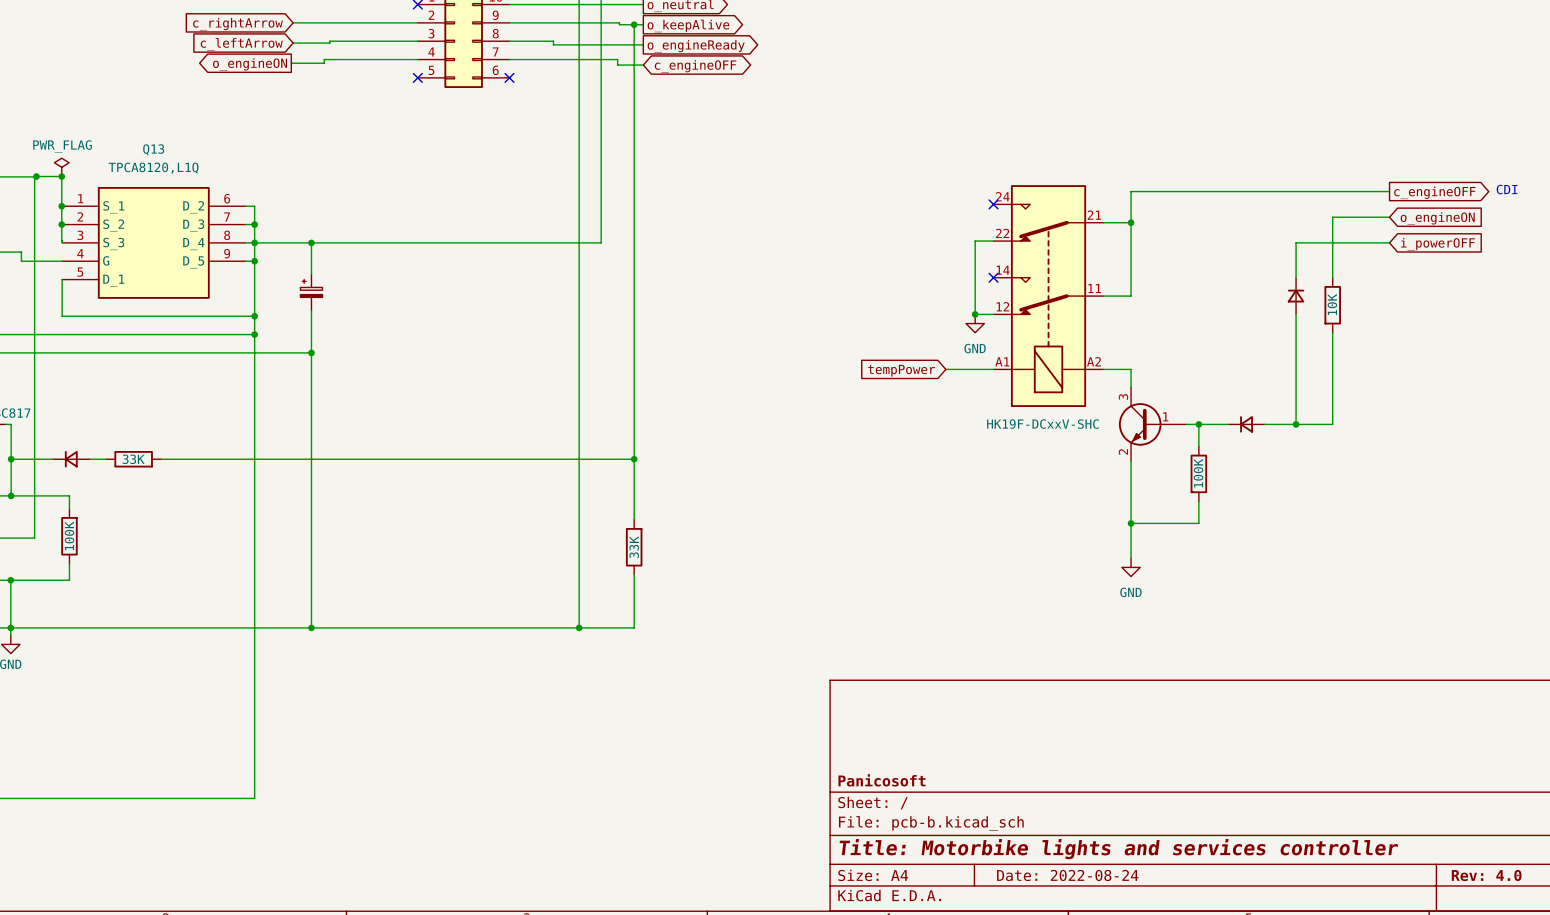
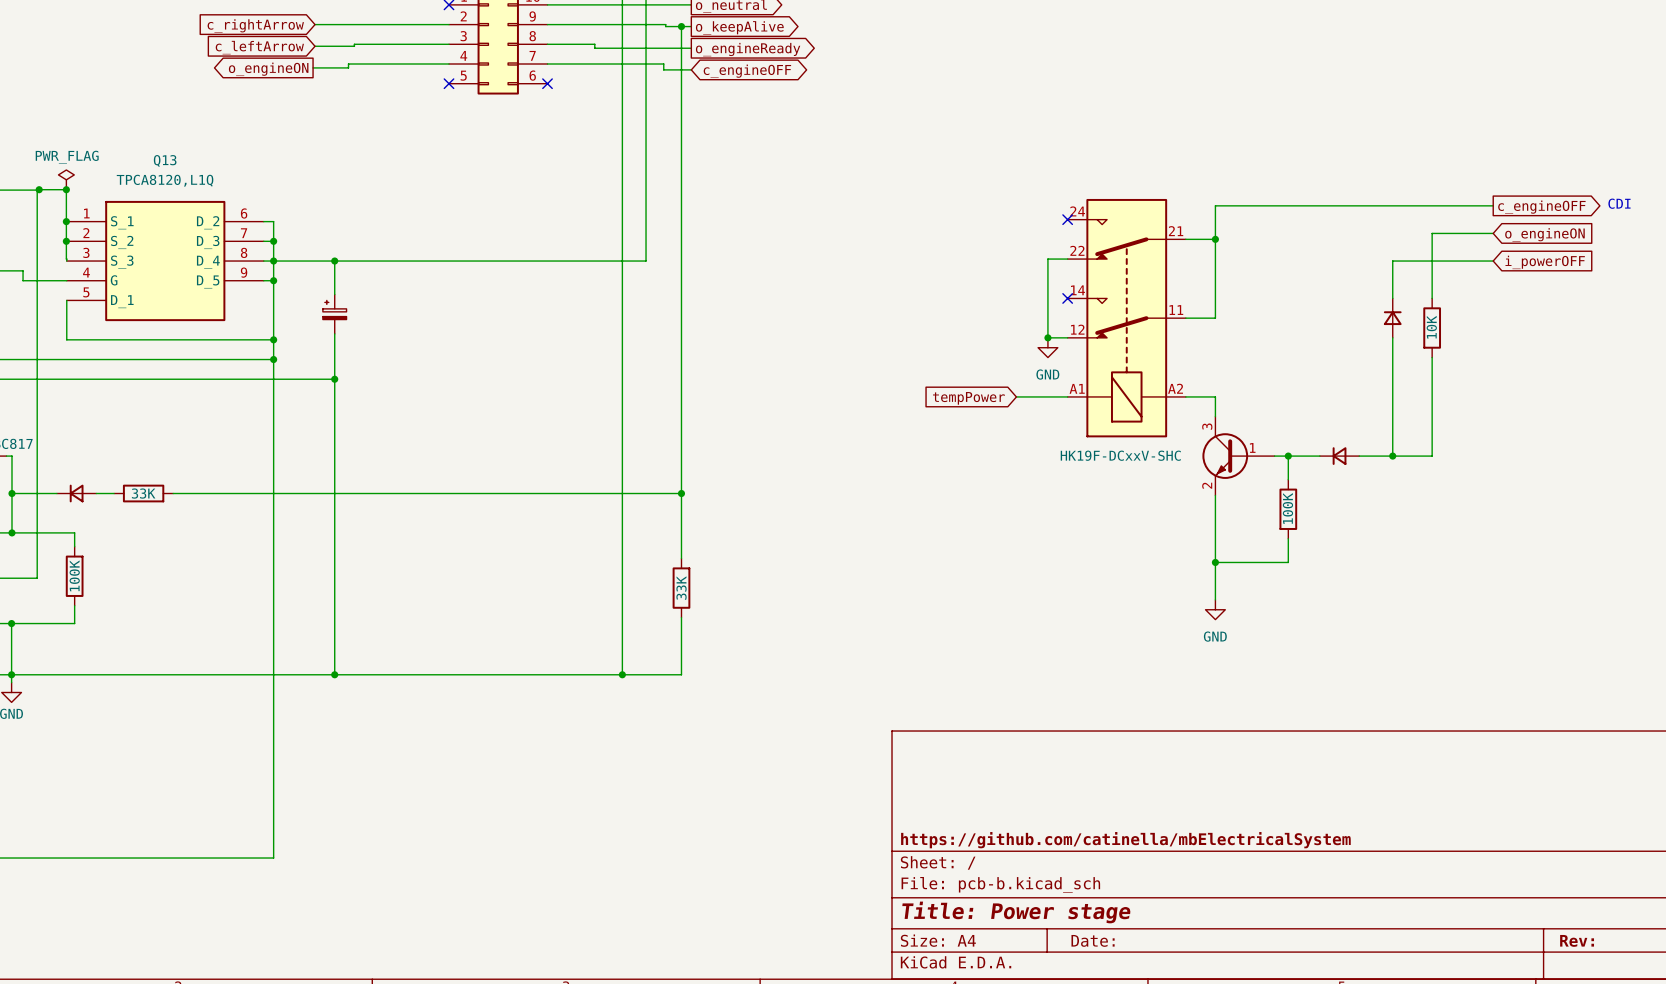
title block: Panicosoft (882, 780) -> https://github.com/catinella/mbElectricalSystem (1125, 840)
title block: Title: Motorbike lights and services controller (1118, 849) -> Title: Power stage (1016, 912)
title block: Date: 2022-08-24 (1067, 875) -> Date: (1093, 940)
title block: Rev: 4.0 (1486, 875) -> Rev: (1577, 940)

